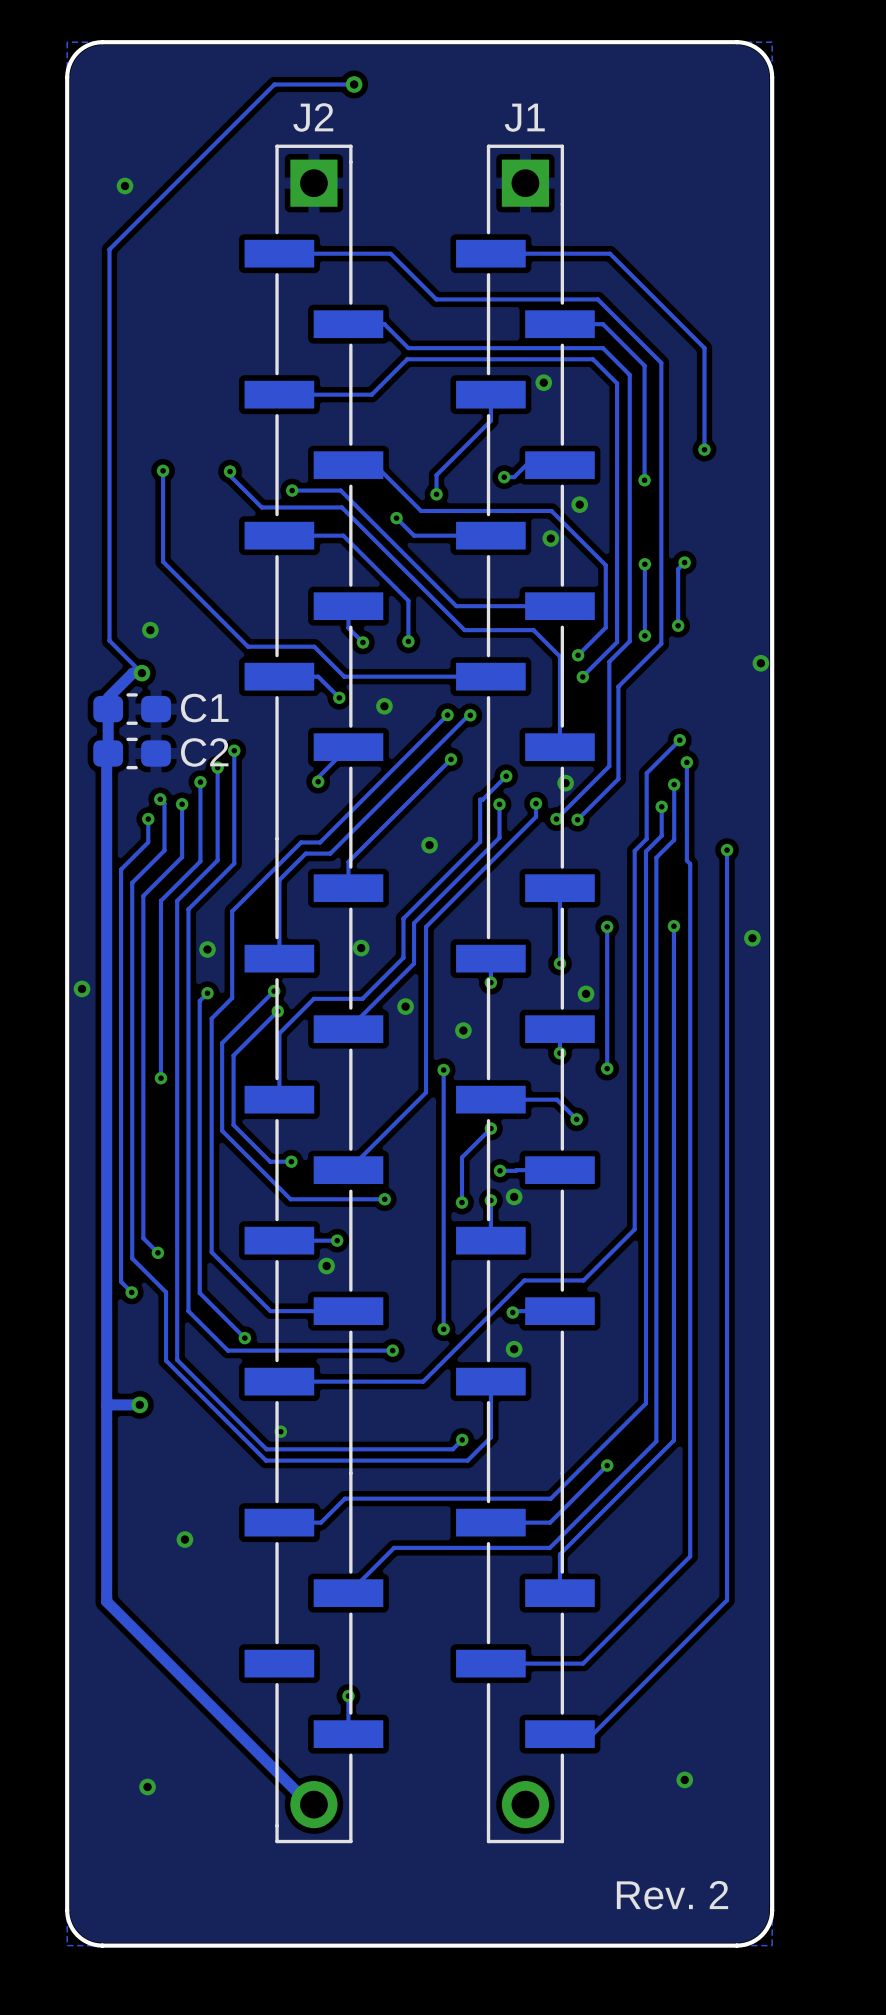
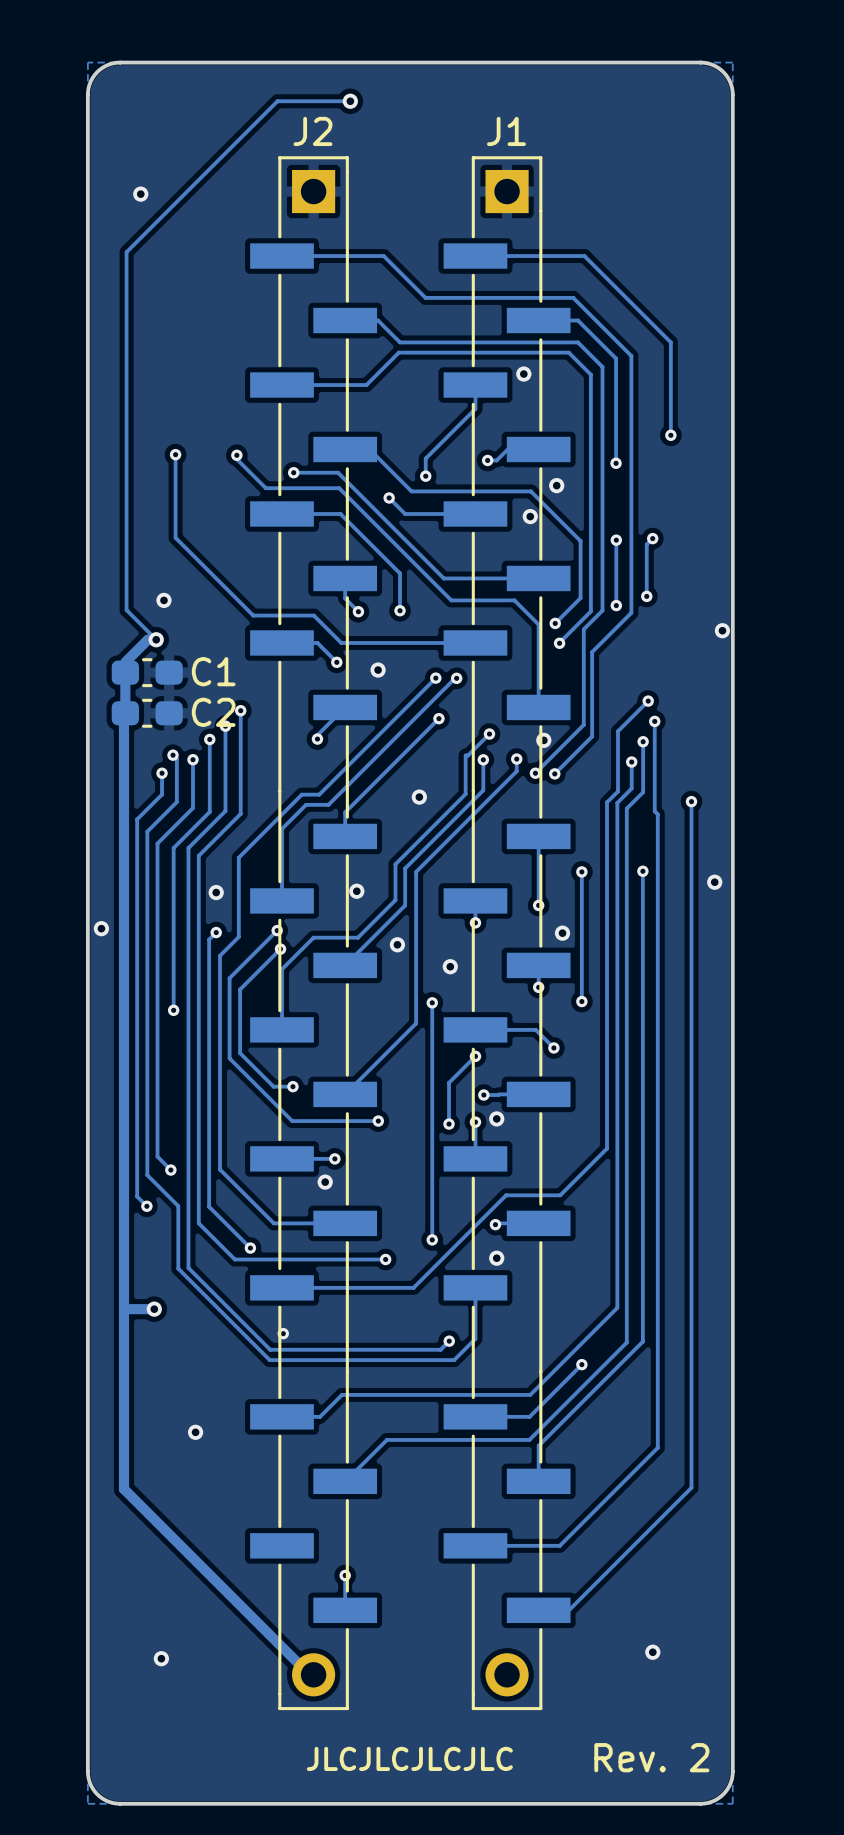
text: none -> JLCJLCJLCJLC (409, 1758)

